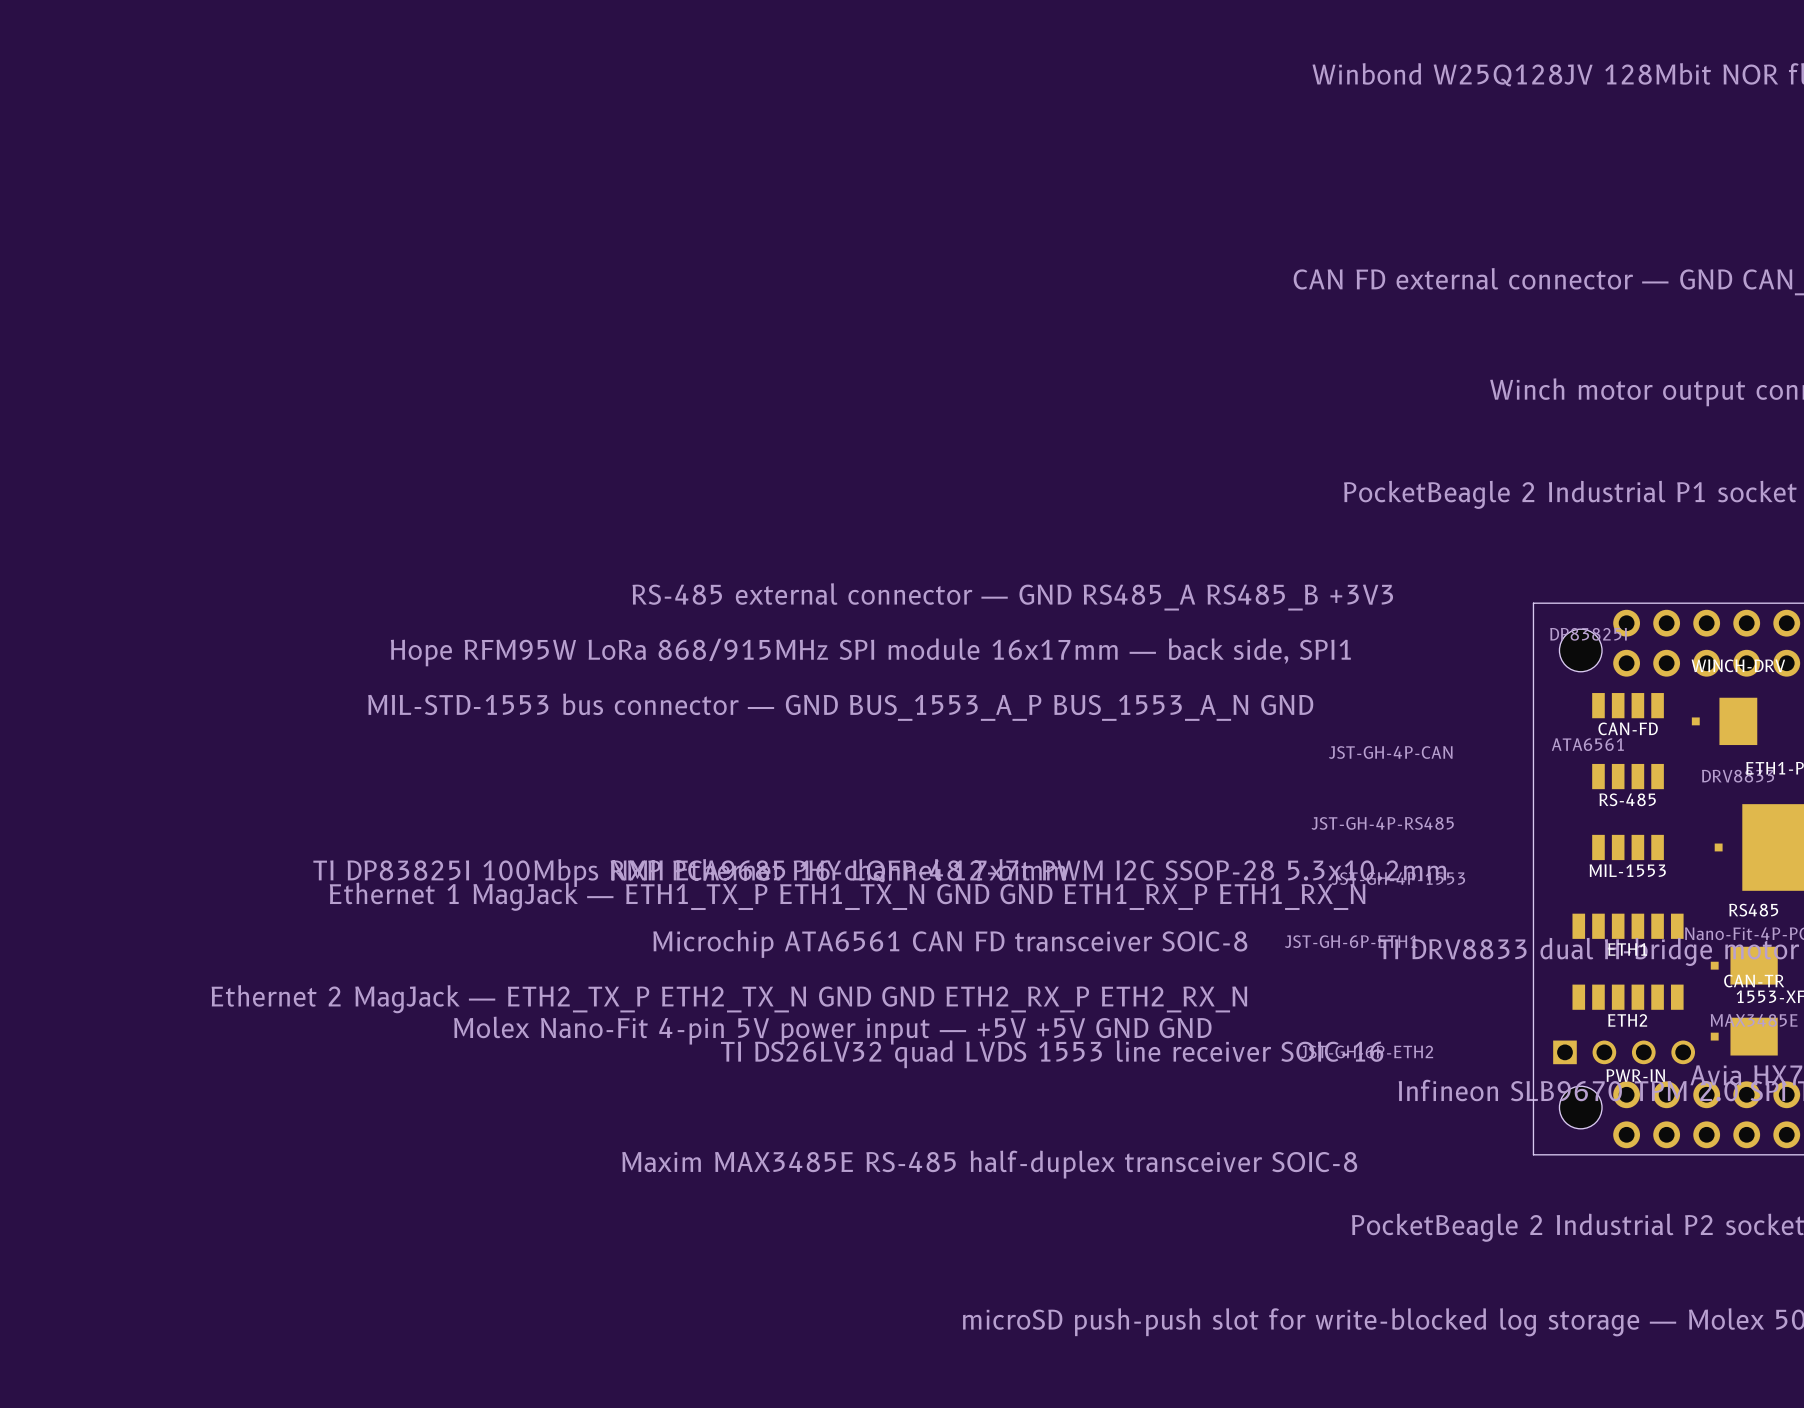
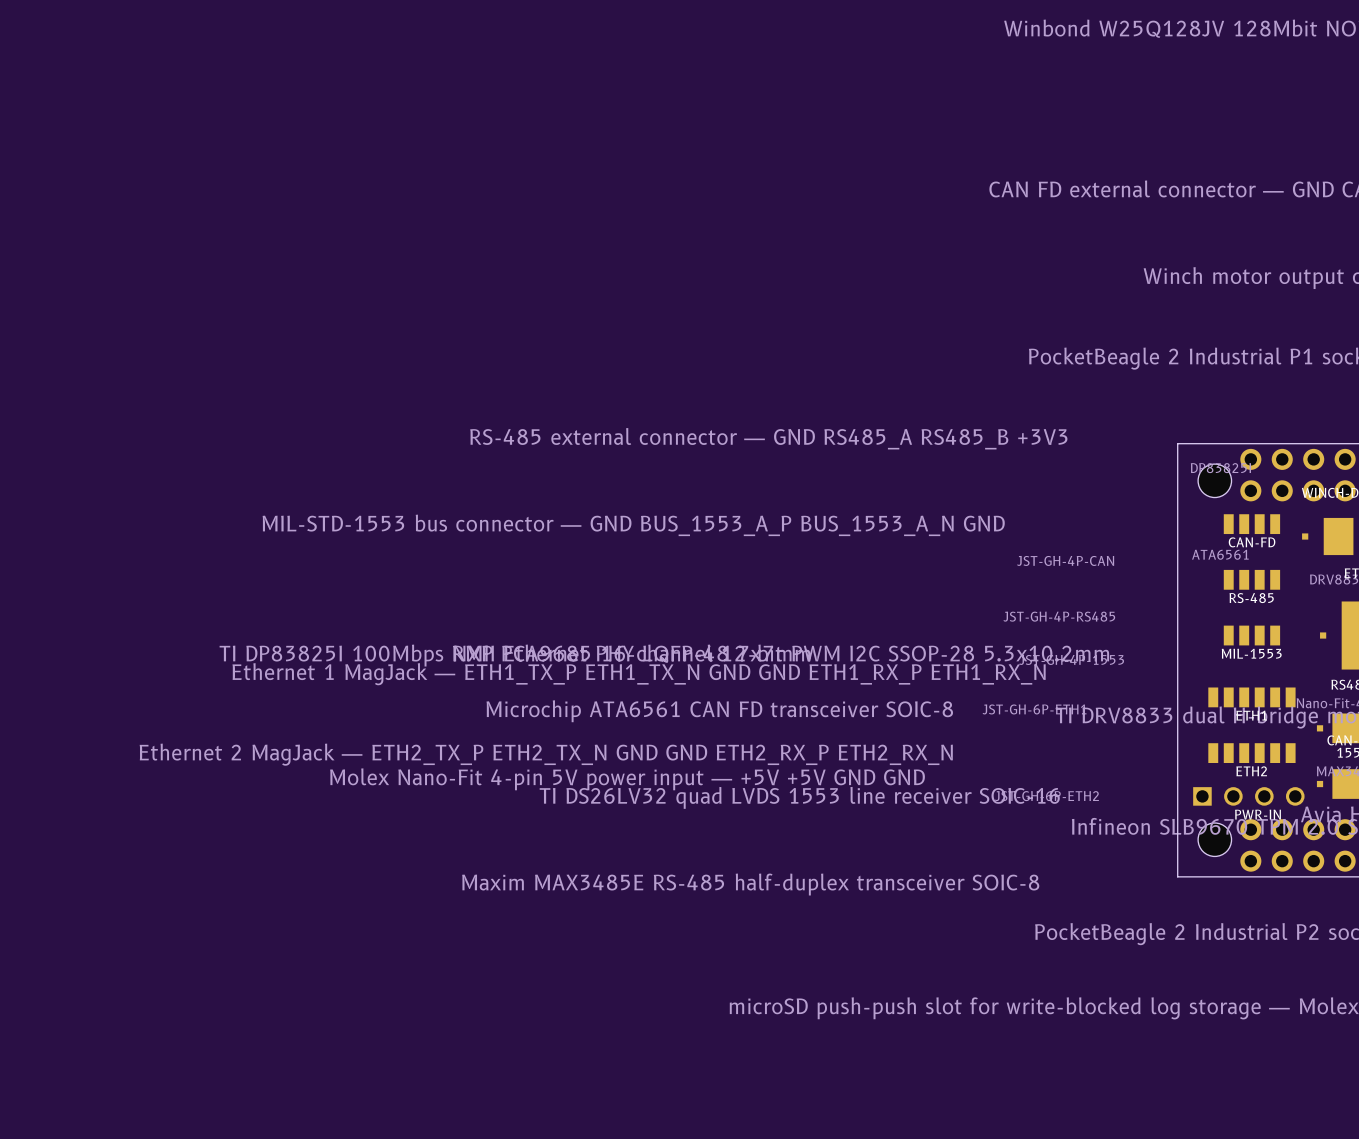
part: (870, 652) -> none

